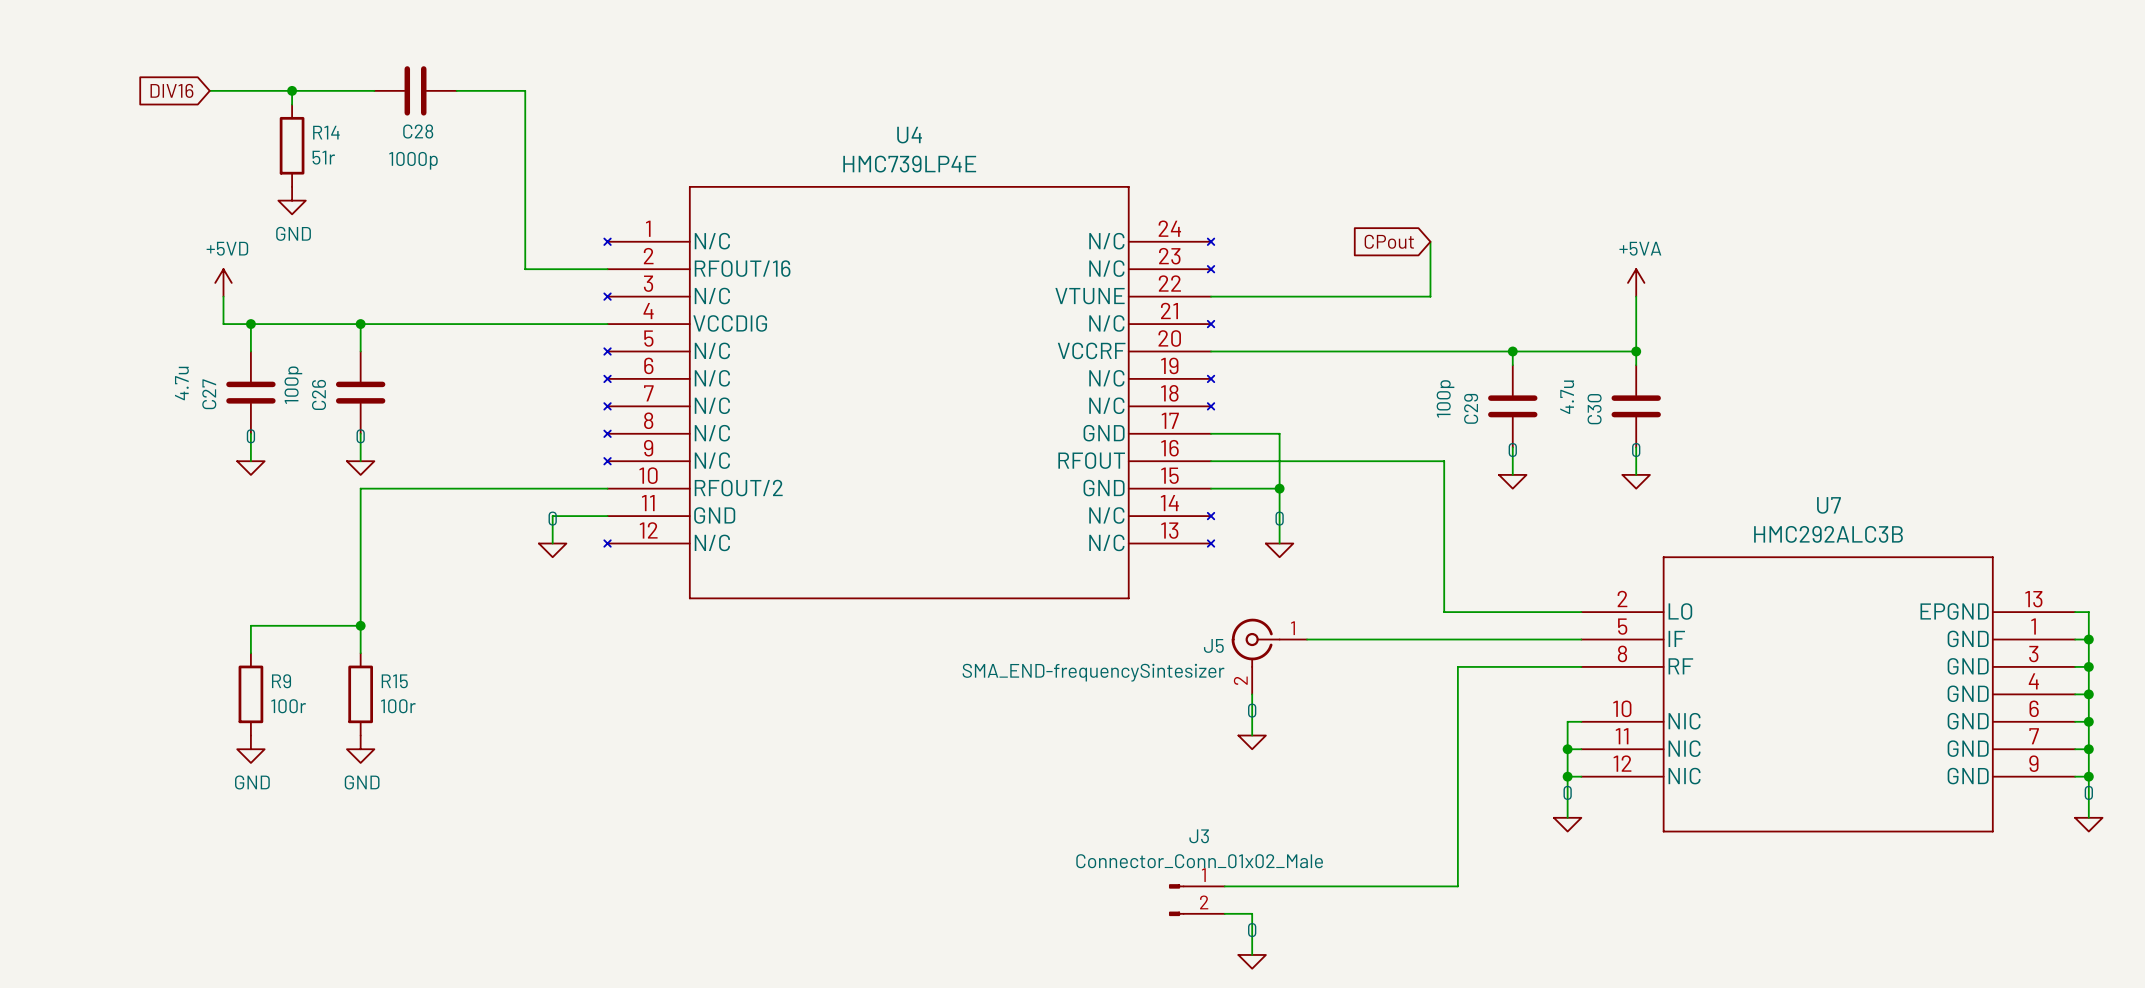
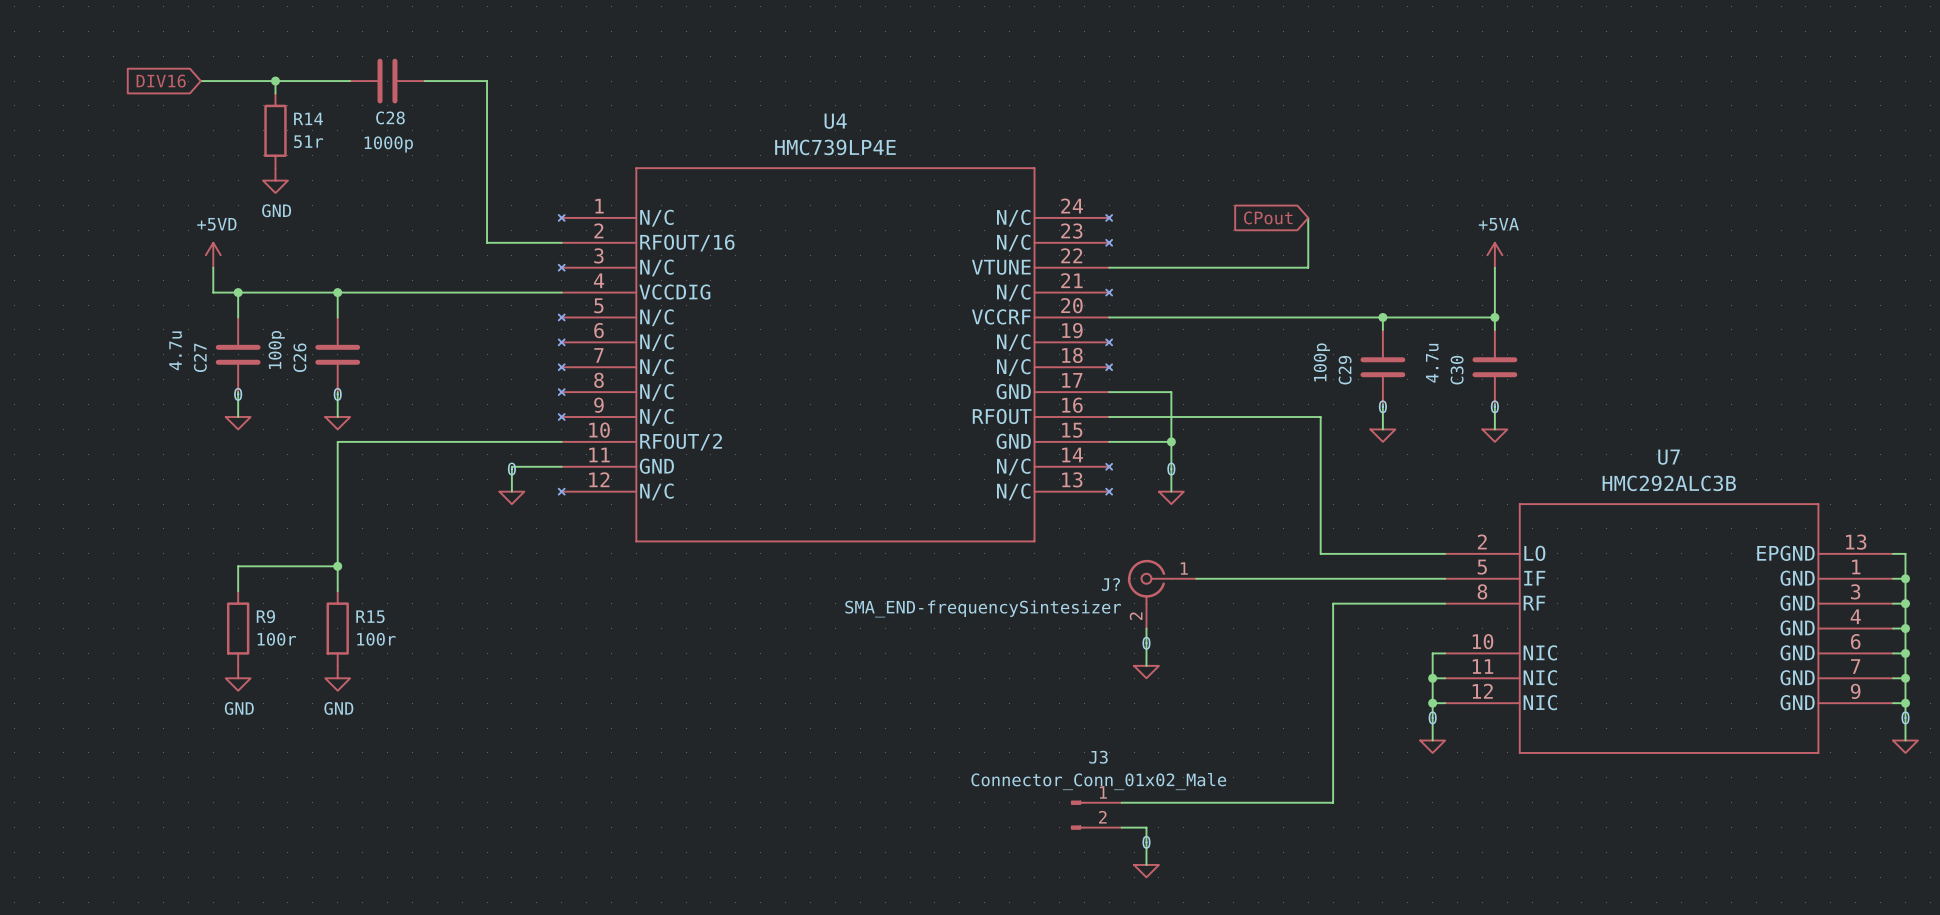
J5 name: J5 (1213, 645) -> J? (1110, 584)

